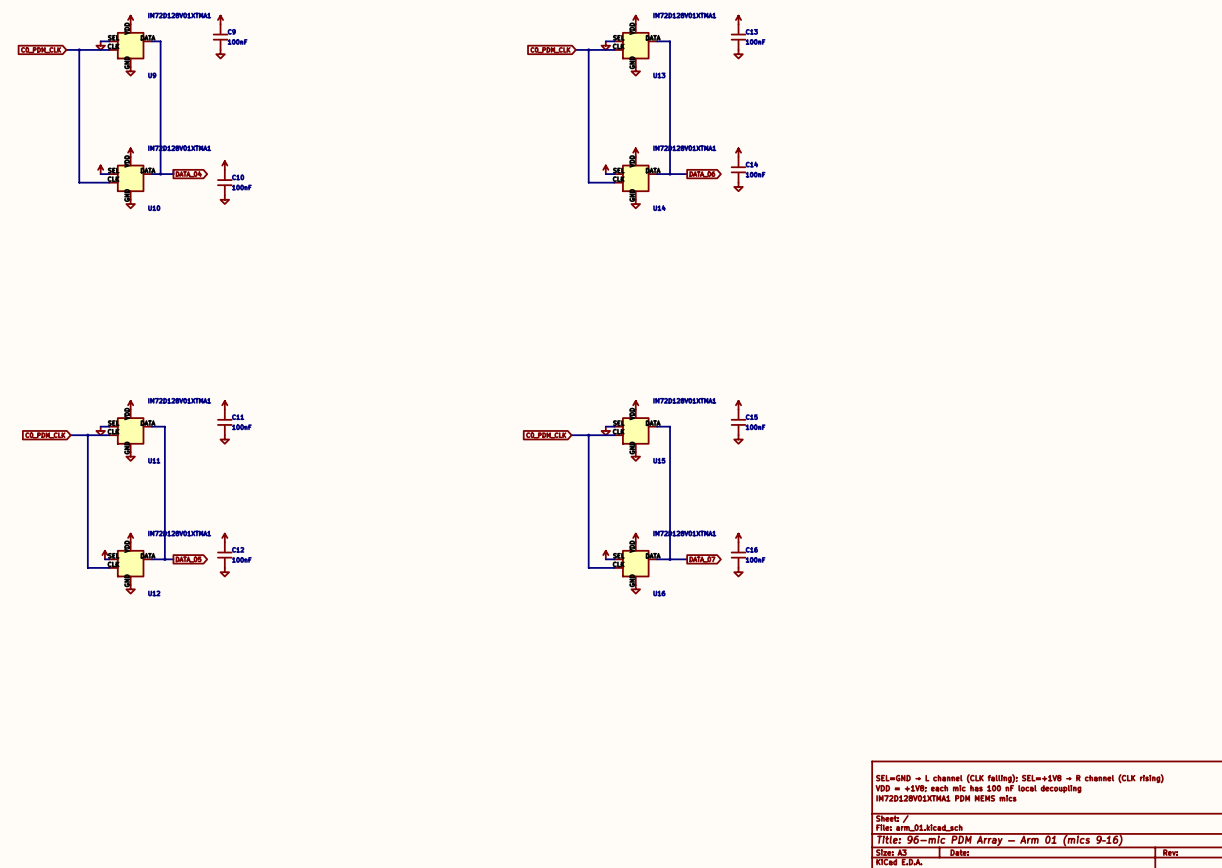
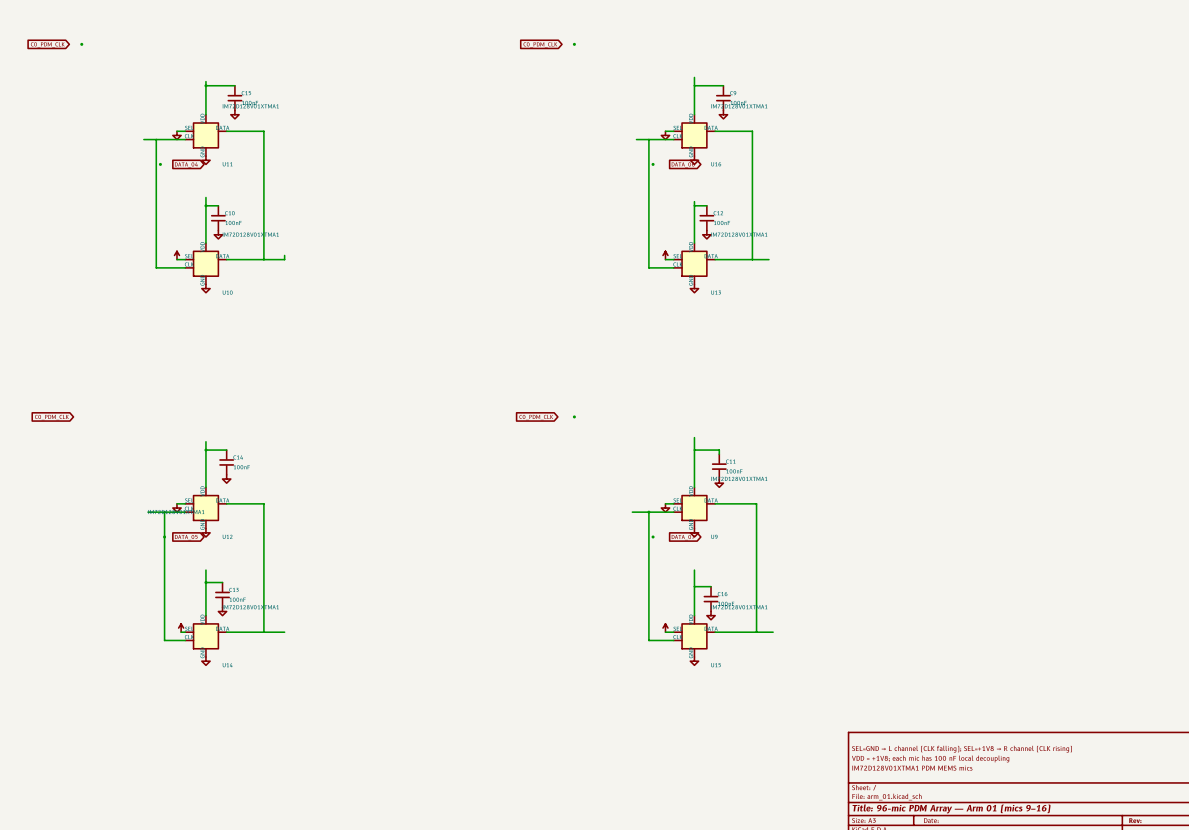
power symbol: (130, 19) -> none
power symbol: (220, 19) -> none
power symbol: (635, 19) -> none
power symbol: (738, 19) -> none
part position: (220, 37) -> (723, 98)
part position: (738, 37) -> (222, 594)
wire: (100, 41) (109, 41) -> none
wire: (152, 41) (160, 41) (160, 174) -> none
wire: (605, 41) (614, 41) -> none
wire: (657, 41) (670, 41) (670, 174) -> none
power symbol: (100, 45) -> none
part position: (130, 45) -> (694, 508)
power symbol: (605, 45) -> none
part position: (635, 45) -> (694, 263)
wire: (66, 49) (109, 49) -> none
wire: (79, 49) (79, 182) (109, 182) -> none
wire: (575, 49) (614, 49) -> none
wire: (588, 49) (588, 182) (614, 182) -> none
power symbol: (220, 54) -> none
power symbol: (738, 54) -> none
power symbol: (130, 71) -> none
power symbol: (635, 71) -> none
wire: none -> (694, 77) (694, 114)
wire: none -> (205, 81) (205, 114)
wire: none -> (205, 85) (234, 85)
wire: none -> (694, 85) (723, 85)
power symbol: none -> (234, 114)
power symbol: none -> (723, 114)
wire: none -> (176, 131) (185, 131)
wire: none -> (226, 131) (263, 131) (263, 259)
wire: none -> (665, 131) (673, 131)
wire: none -> (715, 131) (752, 131) (752, 259)
power symbol: none -> (176, 135)
power symbol: none -> (665, 135)
wire: none -> (143, 139) (185, 139)
wire: none -> (156, 139) (156, 267) (185, 267)
wire: none -> (636, 139) (673, 139)
wire: none -> (648, 139) (648, 267) (673, 267)
power symbol: (130, 152) -> none
power symbol: (635, 152) -> none
power symbol: (738, 152) -> none
power symbol: (224, 165) -> none
power symbol: (100, 169) -> none
wire: (173, 169) (173, 174) (152, 174) -> none
power symbol: none -> (205, 160)
power symbol: (605, 169) -> none
power symbol: none -> (694, 160)
part position: (738, 169) -> (226, 462)
wire: (100, 174) (109, 174) -> none
wire: (605, 174) (614, 174) -> none
wire: (657, 174) (687, 174) -> none
part position: (130, 178) -> (205, 263)
part position: (635, 178) -> (205, 636)
part position: (224, 182) -> (218, 218)
power symbol: (738, 186) -> none
power symbol: (224, 199) -> none
power symbol: (130, 204) -> none
power symbol: (635, 204) -> none
wire: none -> (205, 197) (205, 243)
wire: none -> (694, 201) (694, 243)
wire: none -> (205, 205) (218, 205)
wire: none -> (694, 205) (706, 205)
power symbol: none -> (218, 234)
power symbol: none -> (706, 234)
power symbol: none -> (176, 255)
wire: none -> (284, 255) (284, 259) (226, 259)
power symbol: none -> (665, 255)
wire: none -> (176, 259) (185, 259)
wire: none -> (665, 259) (673, 259)
wire: none -> (715, 259) (768, 259)
power symbol: none -> (205, 288)
power symbol: none -> (694, 288)
power symbol: (130, 405) -> none
power symbol: (224, 405) -> none
power symbol: (635, 405) -> none
power symbol: (738, 405) -> none
part position: (224, 422) -> (719, 466)
part position: (738, 422) -> (234, 98)
wire: (100, 426) (109, 426) -> none
wire: (152, 426) (164, 426) (164, 533) -> none
wire: (605, 426) (614, 426) -> none
wire: (657, 426) (670, 426) (670, 559) -> none
power symbol: (100, 430) -> none
part position: (130, 430) -> (205, 135)
power symbol: (605, 430) -> none
part position: (635, 430) -> (694, 636)
wire: (70, 435) (109, 435) -> none
wire: (87, 435) (87, 567) (109, 567) -> none
wire: (571, 435) (614, 435) -> none
wire: (588, 435) (588, 567) (614, 567) -> none
power symbol: (224, 439) -> none
power symbol: (738, 439) -> none
power symbol: (130, 456) -> none
power symbol: (635, 456) -> none
wire: none -> (694, 437) (694, 487)
wire: none -> (205, 441) (205, 487)
wire: none -> (205, 450) (226, 450)
wire: none -> (694, 450) (719, 450) (719, 454)
power symbol: none -> (226, 479)
power symbol: none -> (719, 483)
wire: none -> (176, 503) (185, 503)
wire: none -> (226, 503) (263, 503) (263, 632)
wire: none -> (665, 503) (673, 503)
wire: none -> (715, 503) (756, 503) (756, 632)
power symbol: none -> (176, 508)
power symbol: none -> (665, 508)
wire: none -> (148, 512) (185, 512)
wire: none -> (632, 512) (673, 512)
wire: none -> (648, 512) (648, 640) (673, 640)
power symbol: (130, 537) -> none
power symbol: (224, 537) -> none
power symbol: (635, 537) -> none
power symbol: (738, 537) -> none
power symbol: (104, 555) -> none
part position: (224, 555) -> (706, 218)
power symbol: (605, 555) -> none
part position: (738, 555) -> (711, 599)
wire: (104, 559) (109, 559) -> none
wire: (152, 559) (173, 559) -> none
wire: none -> (164, 536) (164, 640) (185, 640)
wire: (605, 559) (614, 559) -> none
wire: (657, 559) (687, 559) -> none
part position: (130, 563) -> (205, 508)
part position: (635, 563) -> (694, 135)
power symbol position: (224, 572) -> (205, 532)
power symbol position: (738, 572) -> (694, 532)
power symbol: (130, 589) -> none
power symbol: (635, 589) -> none
wire: none -> (205, 570) (205, 615)
wire: none -> (694, 570) (694, 615)
wire: none -> (205, 582) (222, 582)
wire: none -> (694, 586) (711, 586)
power symbol: none -> (222, 611)
power symbol: none -> (711, 615)
power symbol: none -> (181, 628)
power symbol: none -> (665, 628)
wire: none -> (181, 632) (185, 632)
wire: none -> (226, 632) (284, 632)
wire: none -> (665, 632) (673, 632)
wire: none -> (715, 632) (773, 632)
power symbol: none -> (205, 661)
power symbol: none -> (694, 661)

